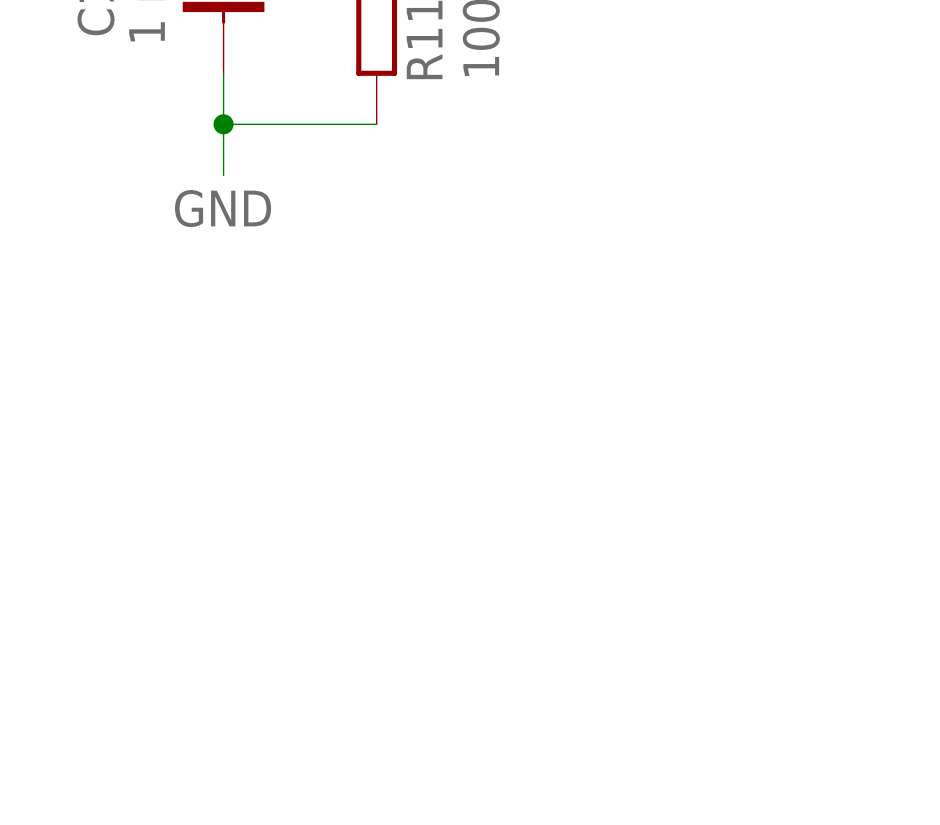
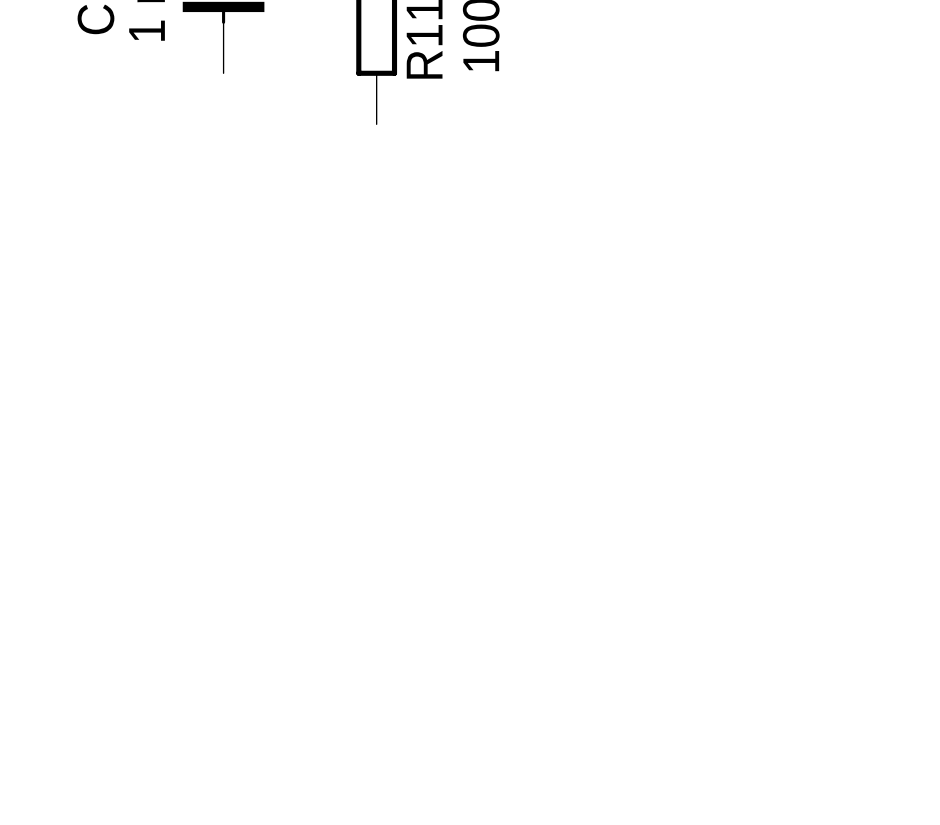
wire: (223, 73) (223, 175) -> none
wire: (223, 124) (376, 124) -> none
junction: (223, 124) -> none
label: GND (223, 208) -> none

